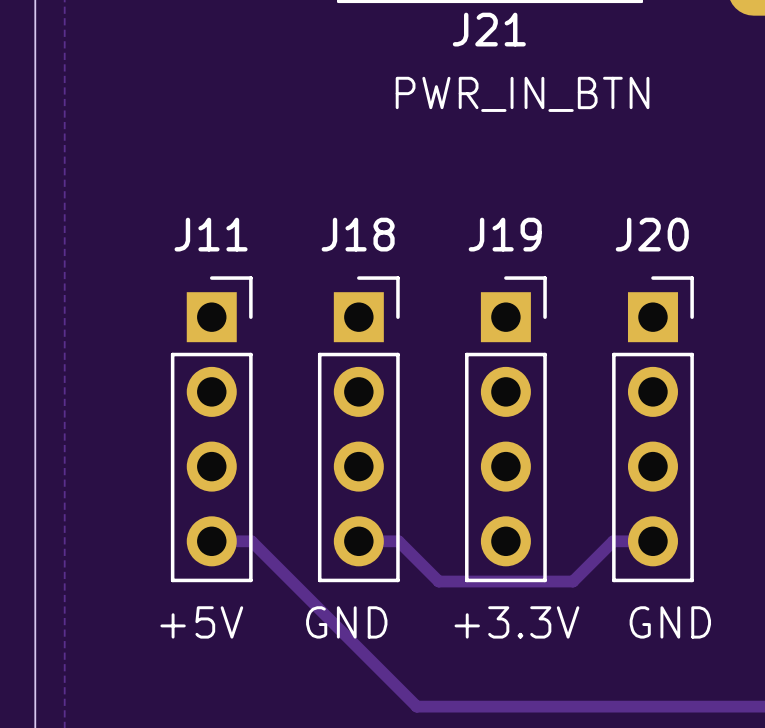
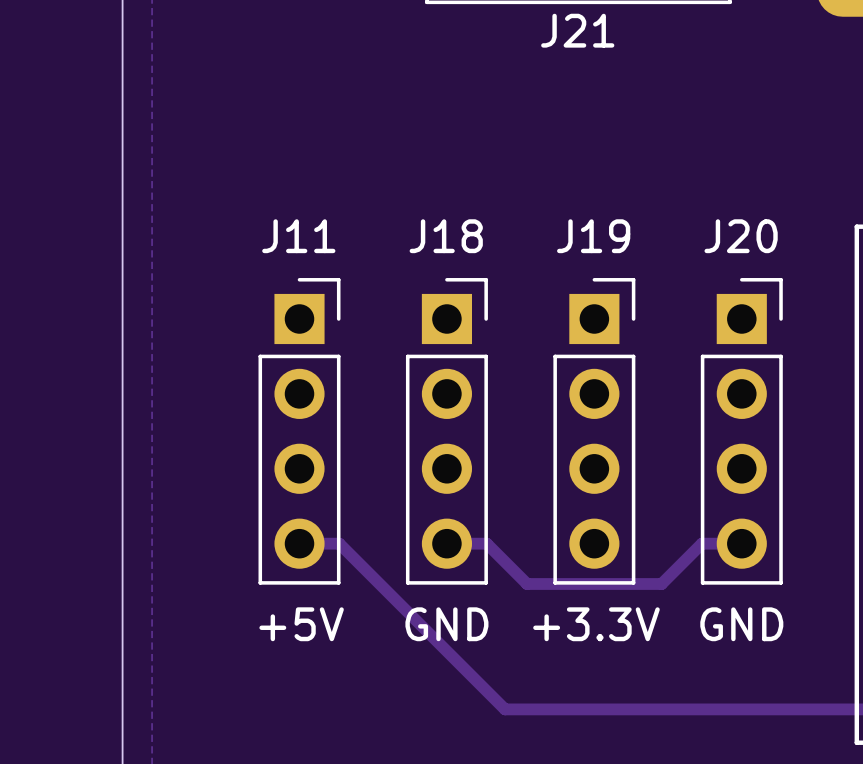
text: PWR_IN_BTN (522, 94) -> none
J11 value: none -> +5V (301, 624)
J18 value: none -> GND (446, 624)
J19 value: none -> +3.3V (596, 624)
J20 value: none -> GND (741, 624)
text: +5V (201, 622) -> none
text: GND (346, 622) -> none
text: +3.3V (516, 622) -> none
text: GND (670, 622) -> none

